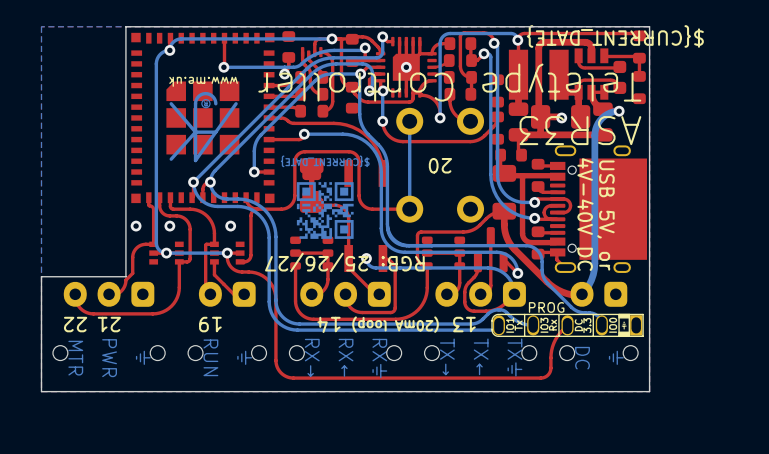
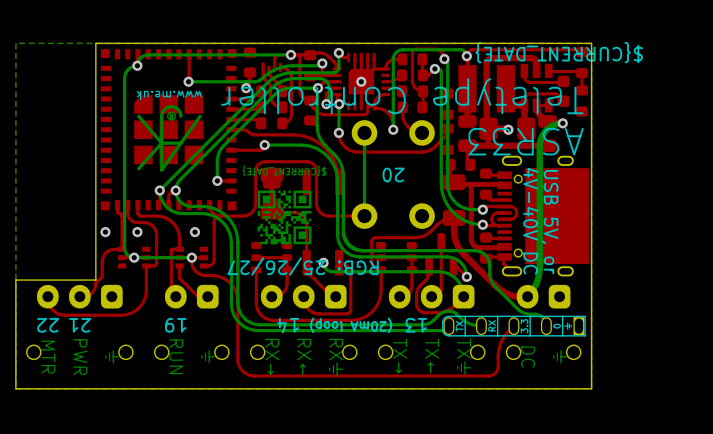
part footprint: [491, 313, 644, 338] -> [442, 315, 586, 337]

